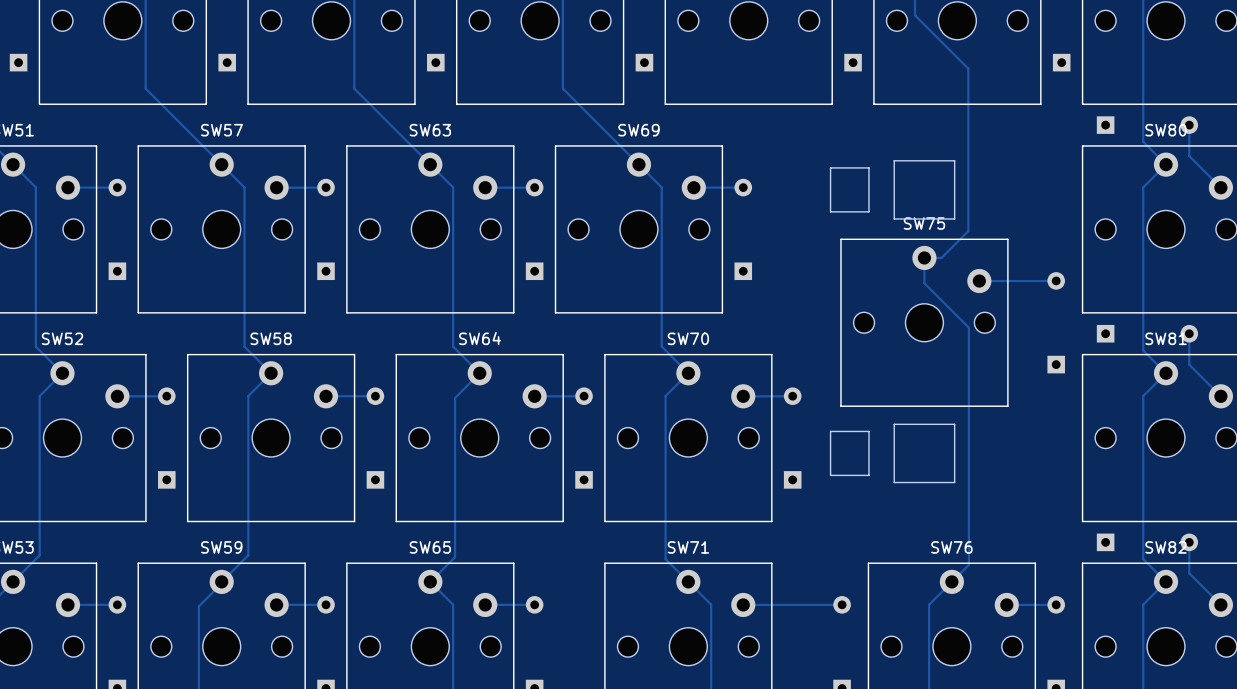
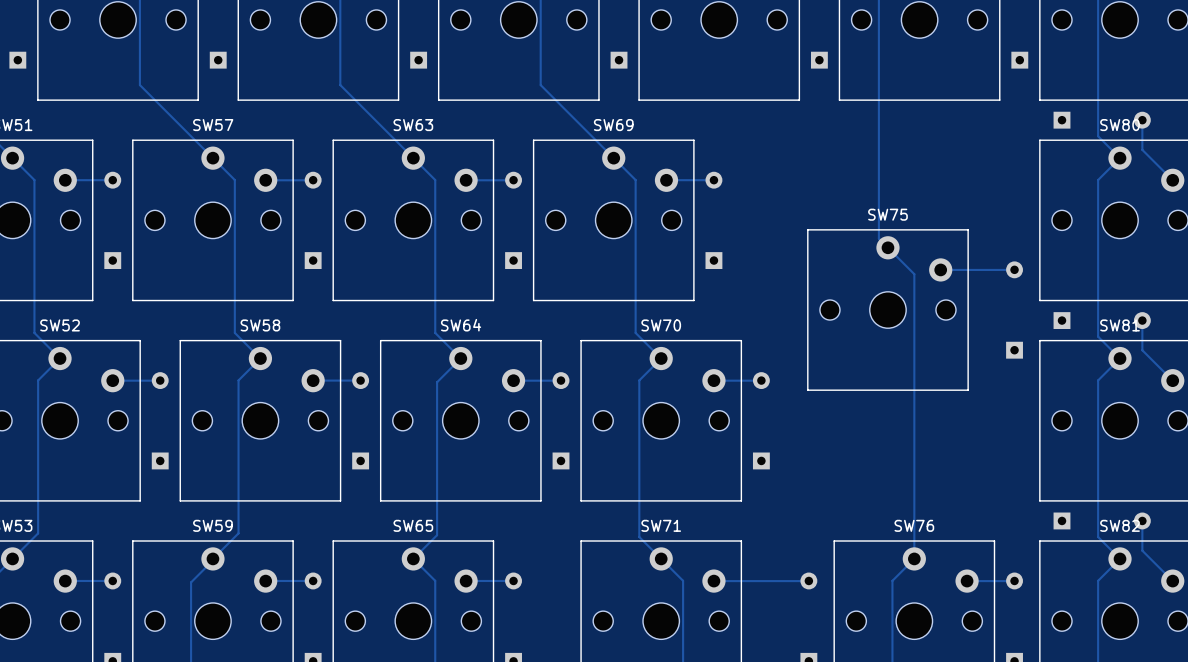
track: (915, 15) (968, 68) (968, 231) (941, 257) (924, 257) (924, 283) (968, 327) (968, 564) (951, 581) -> (878, 14) (878, 238) (914, 274) (914, 558)
SW75 footprint: [829, 160, 1009, 484] -> [807, 229, 969, 391]

